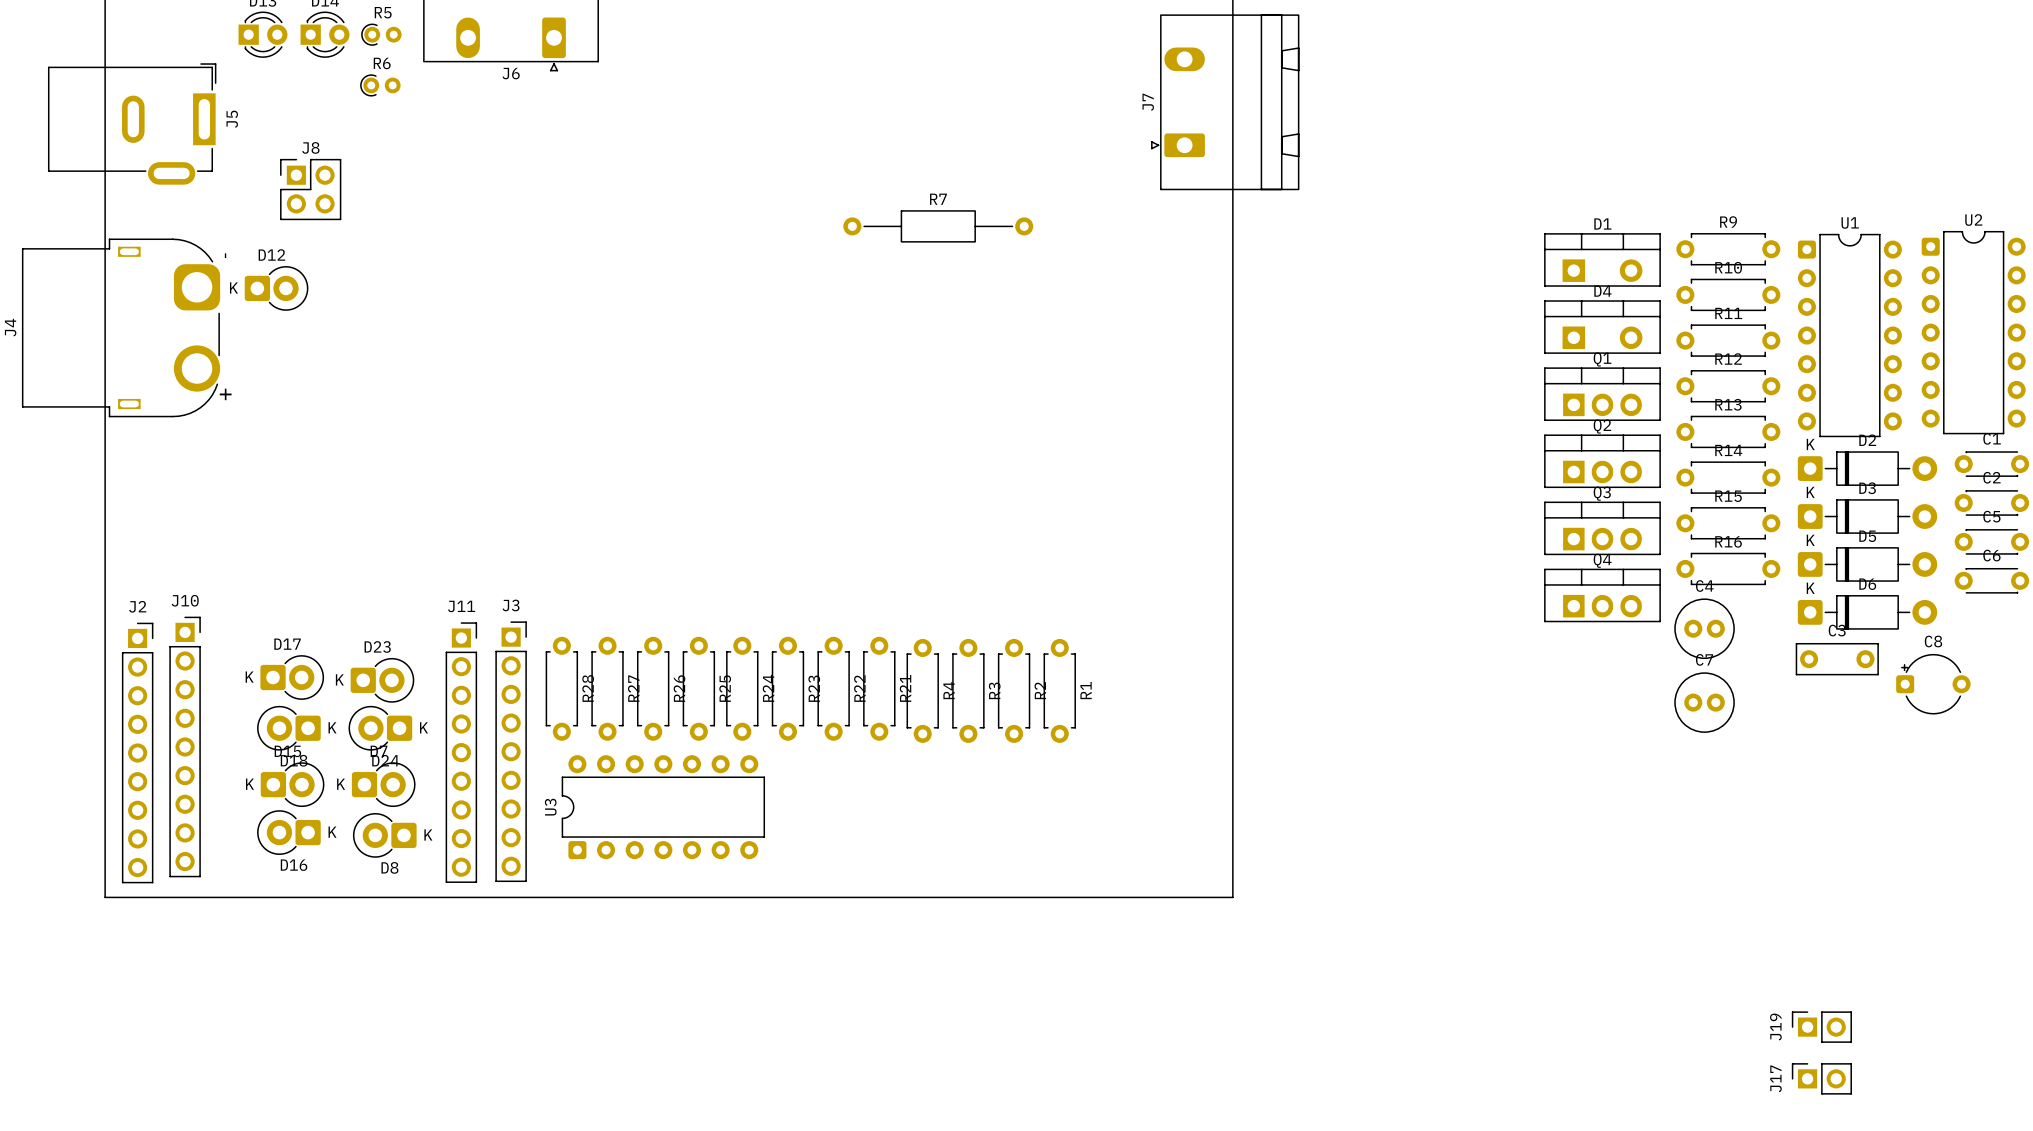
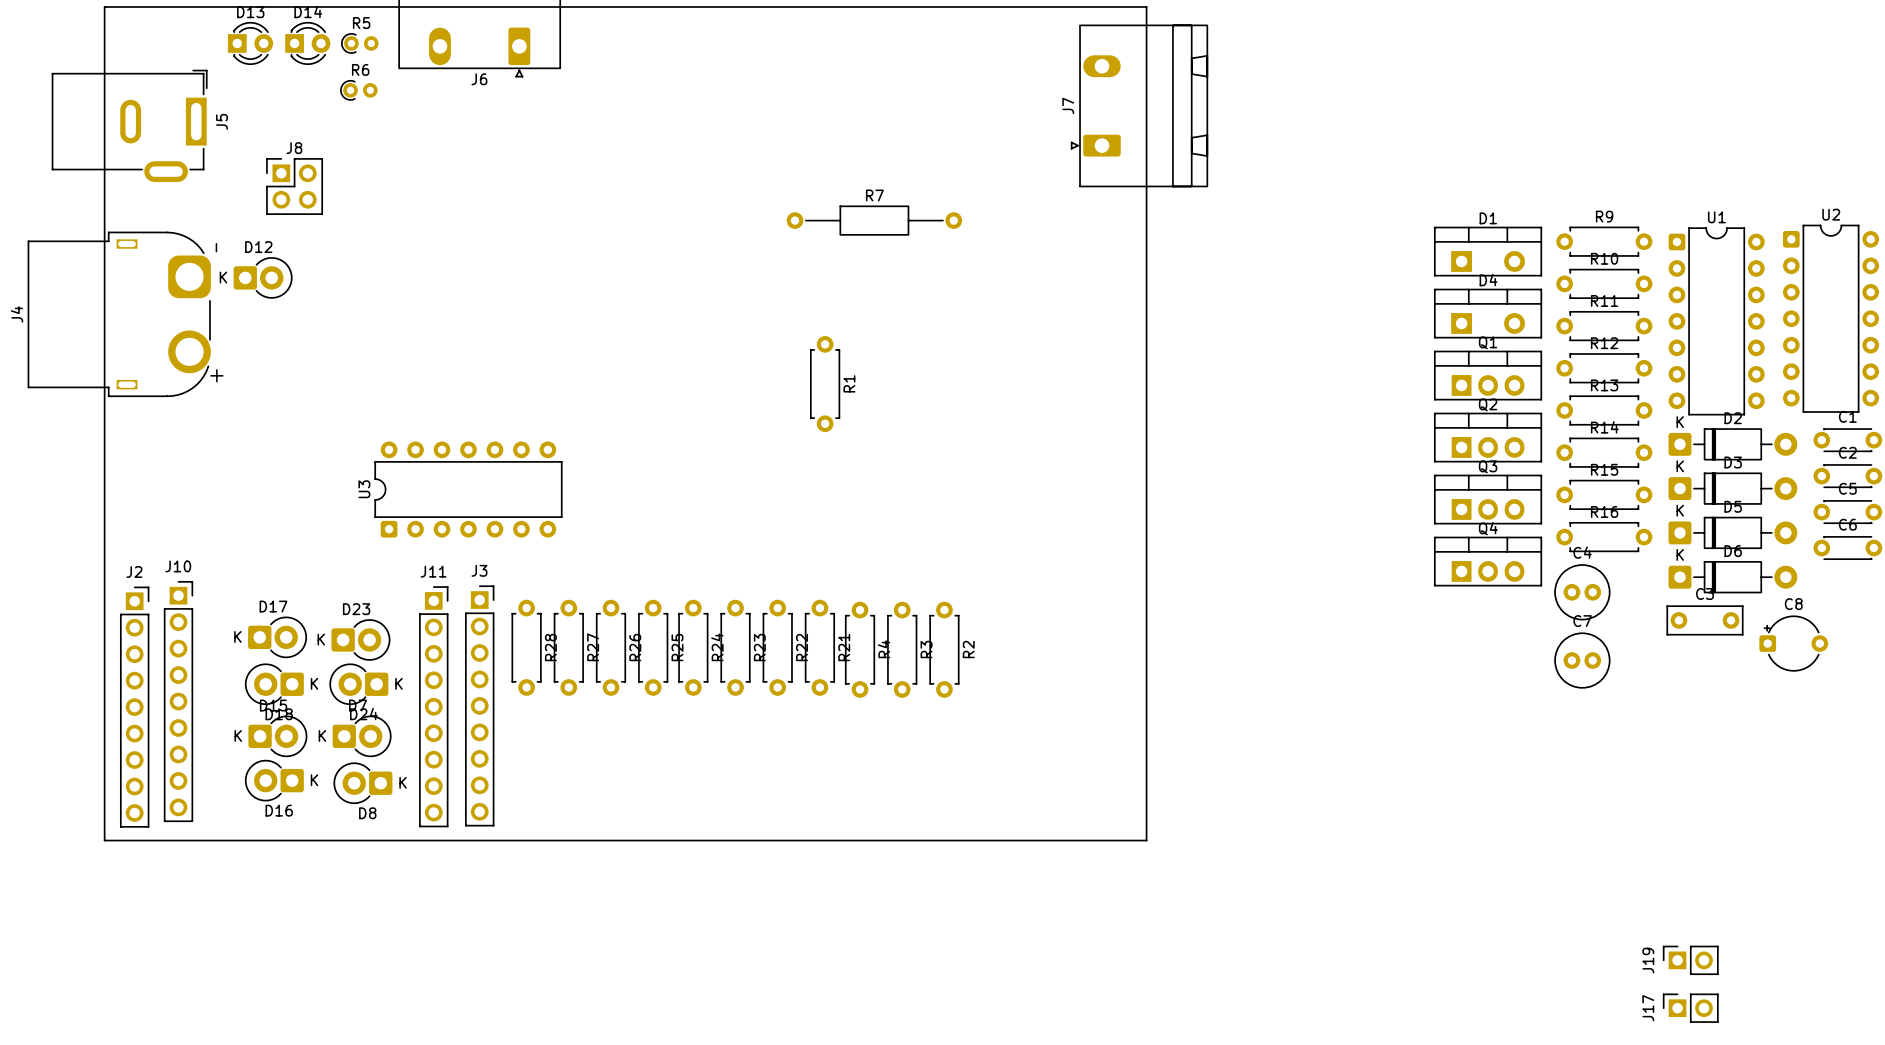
R1 position: (1059, 690) -> (825, 384)
U3 position: (663, 807) -> (468, 489)

